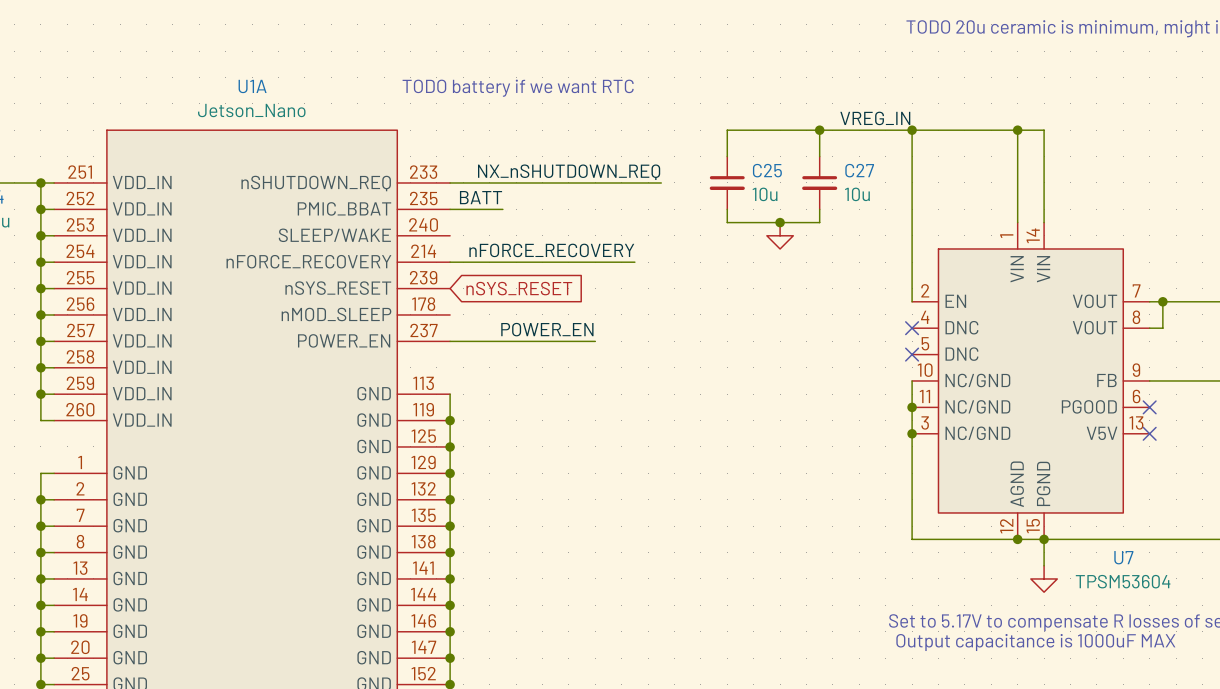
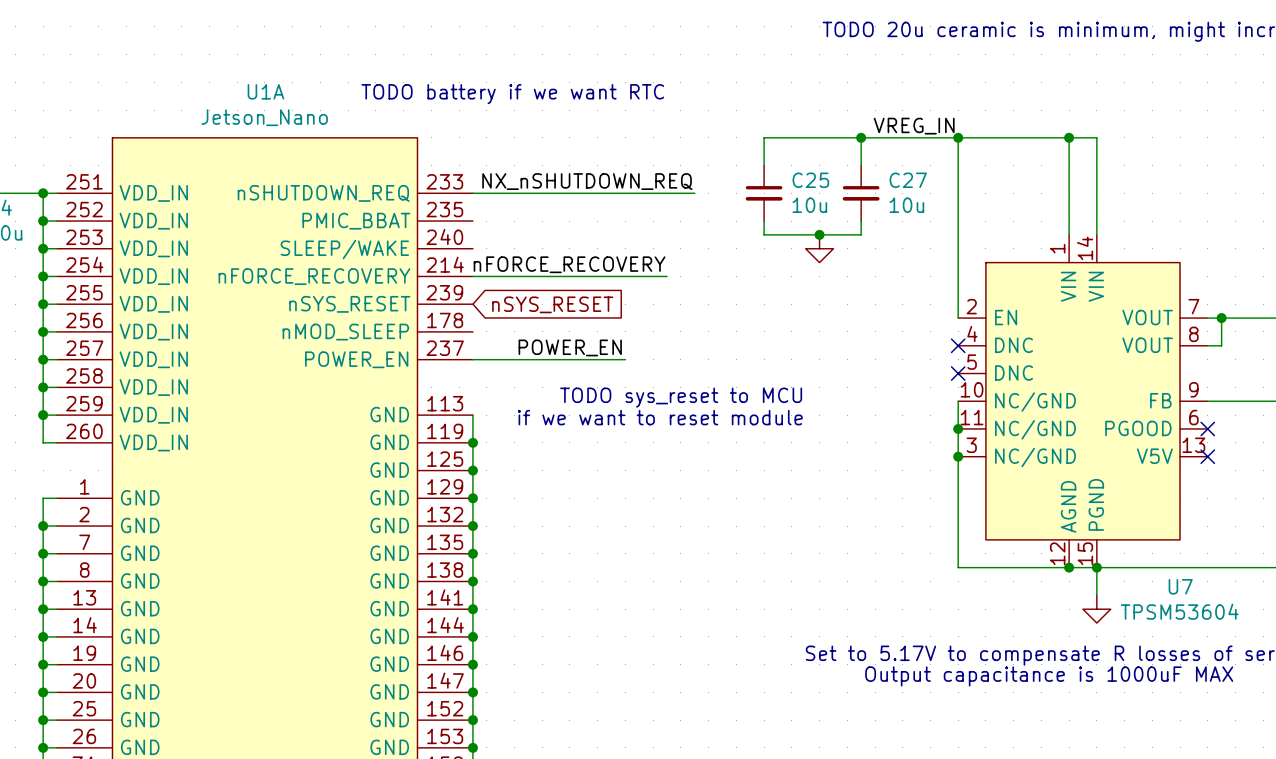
label: BATT (481, 197) -> none
wire: (450, 209) (502, 209) -> none
text: none -> TODO sys_reset to MCU (681, 397)
text: none -> if we want to reset module (660, 417)

